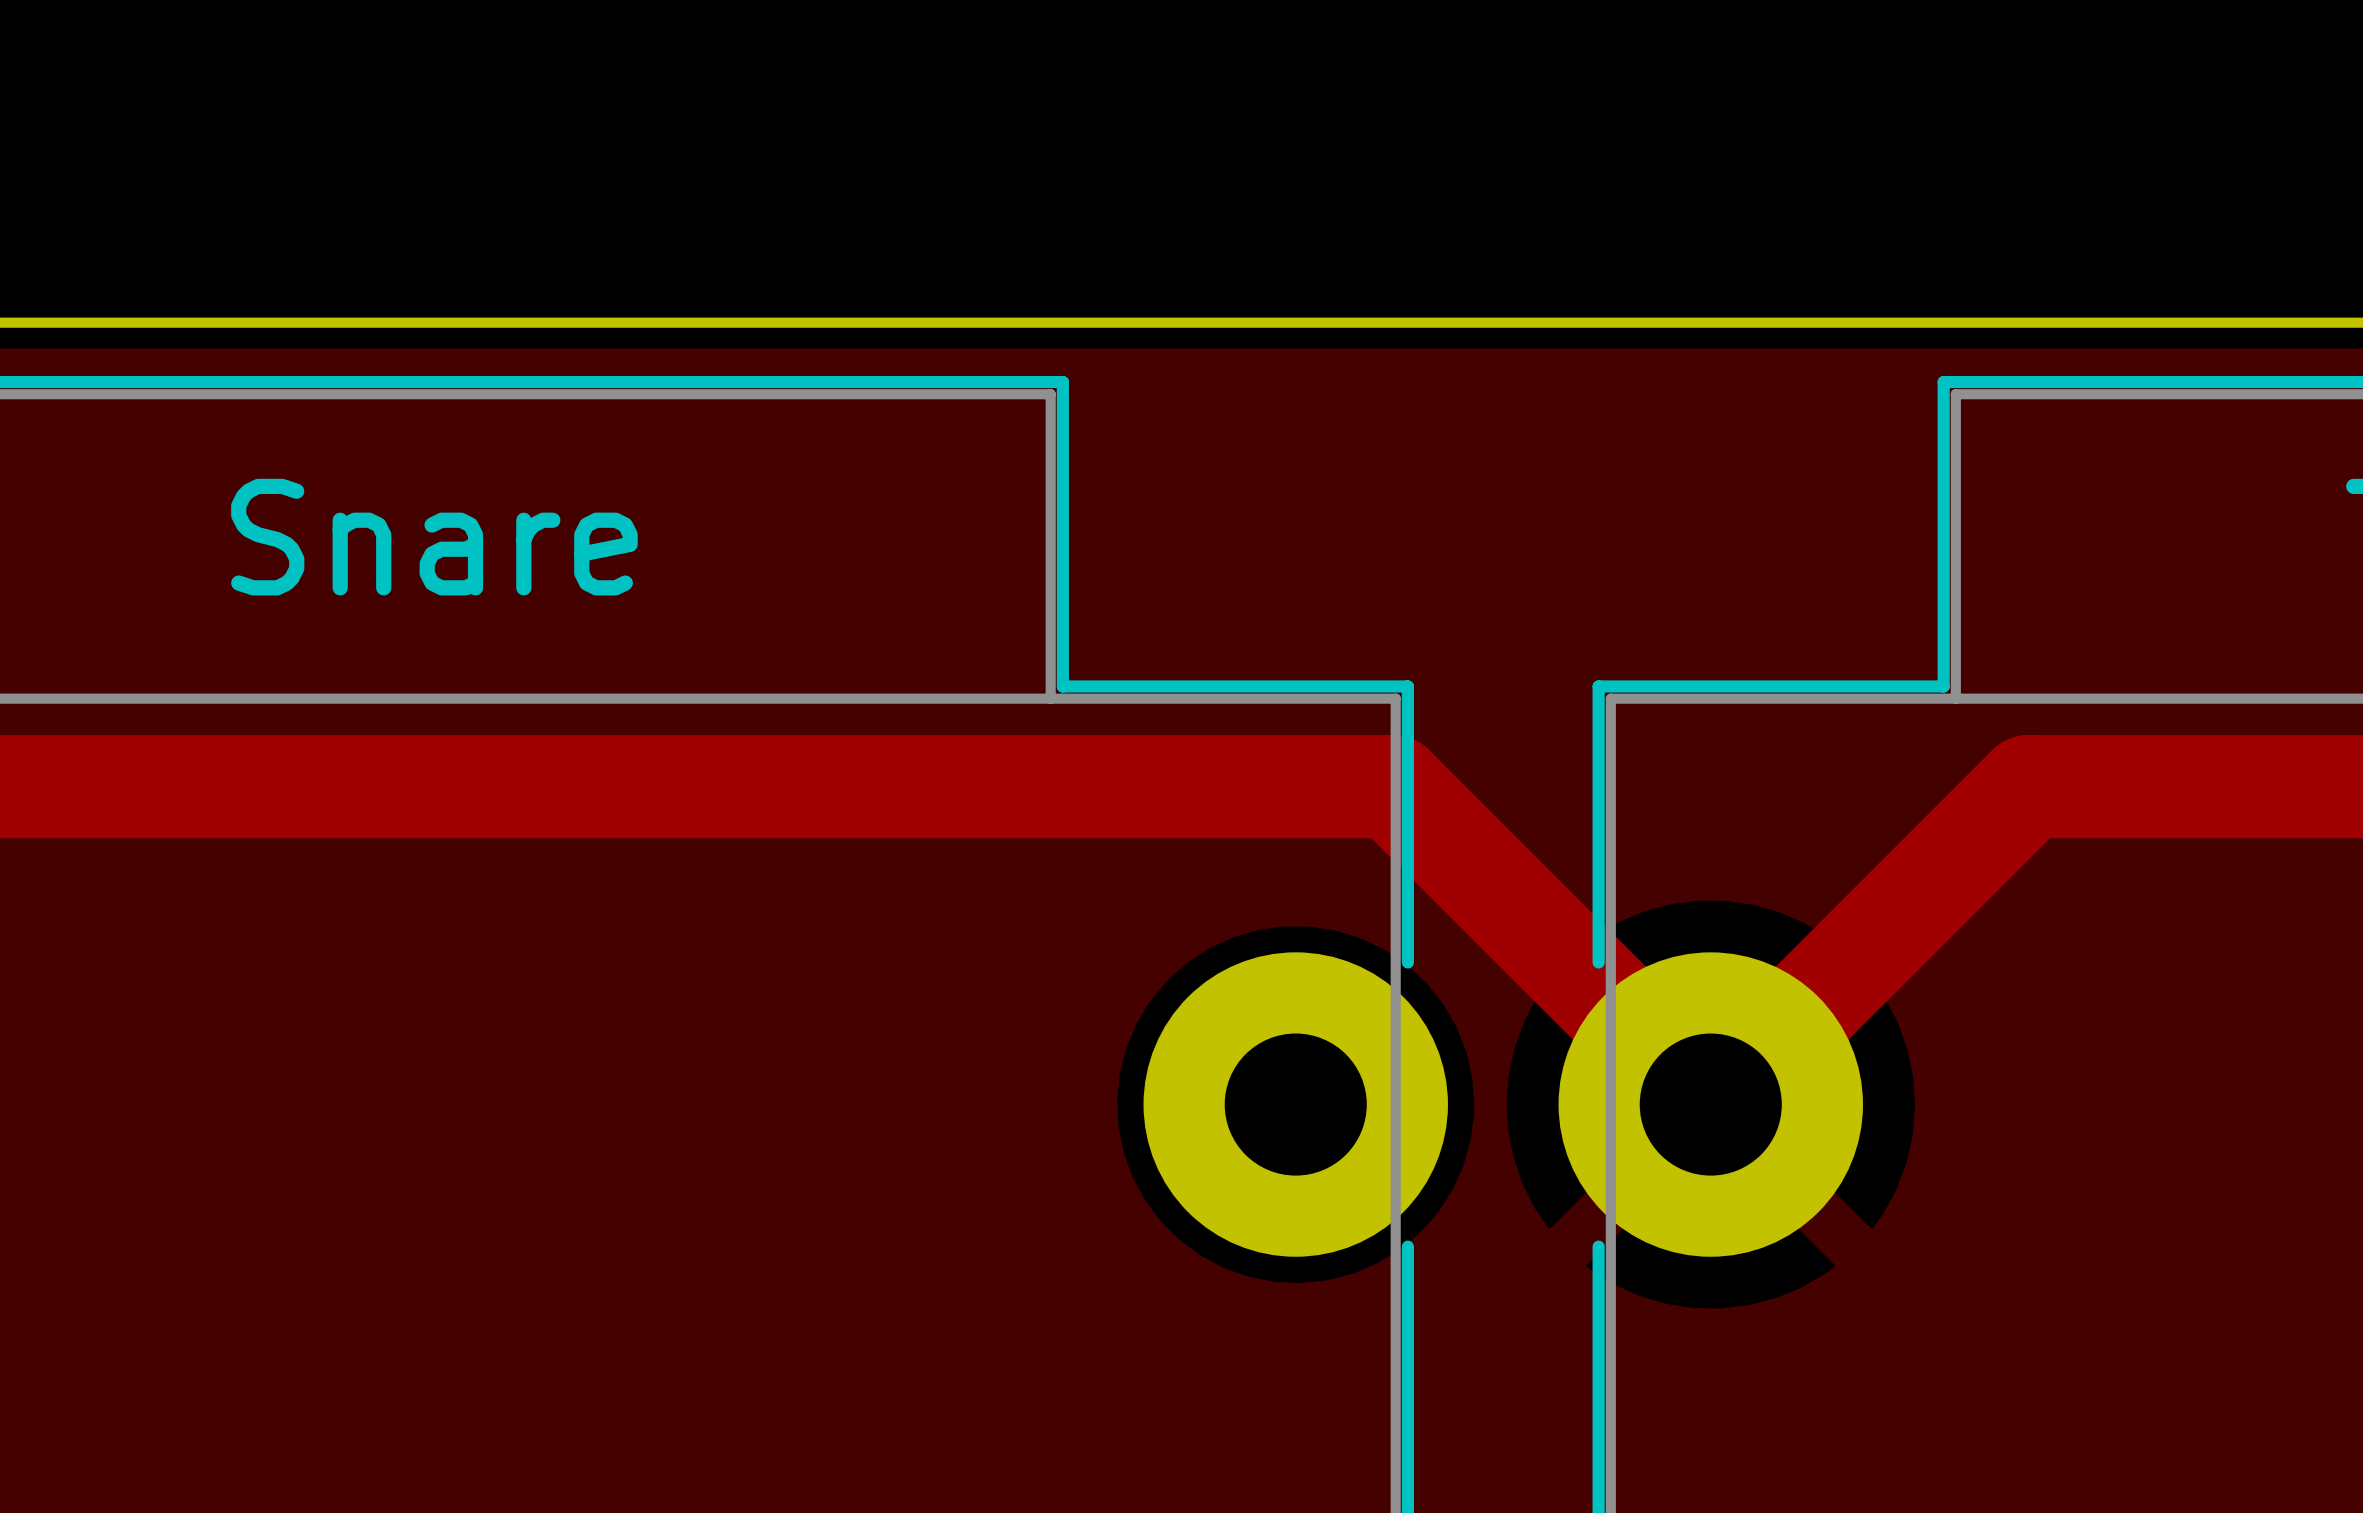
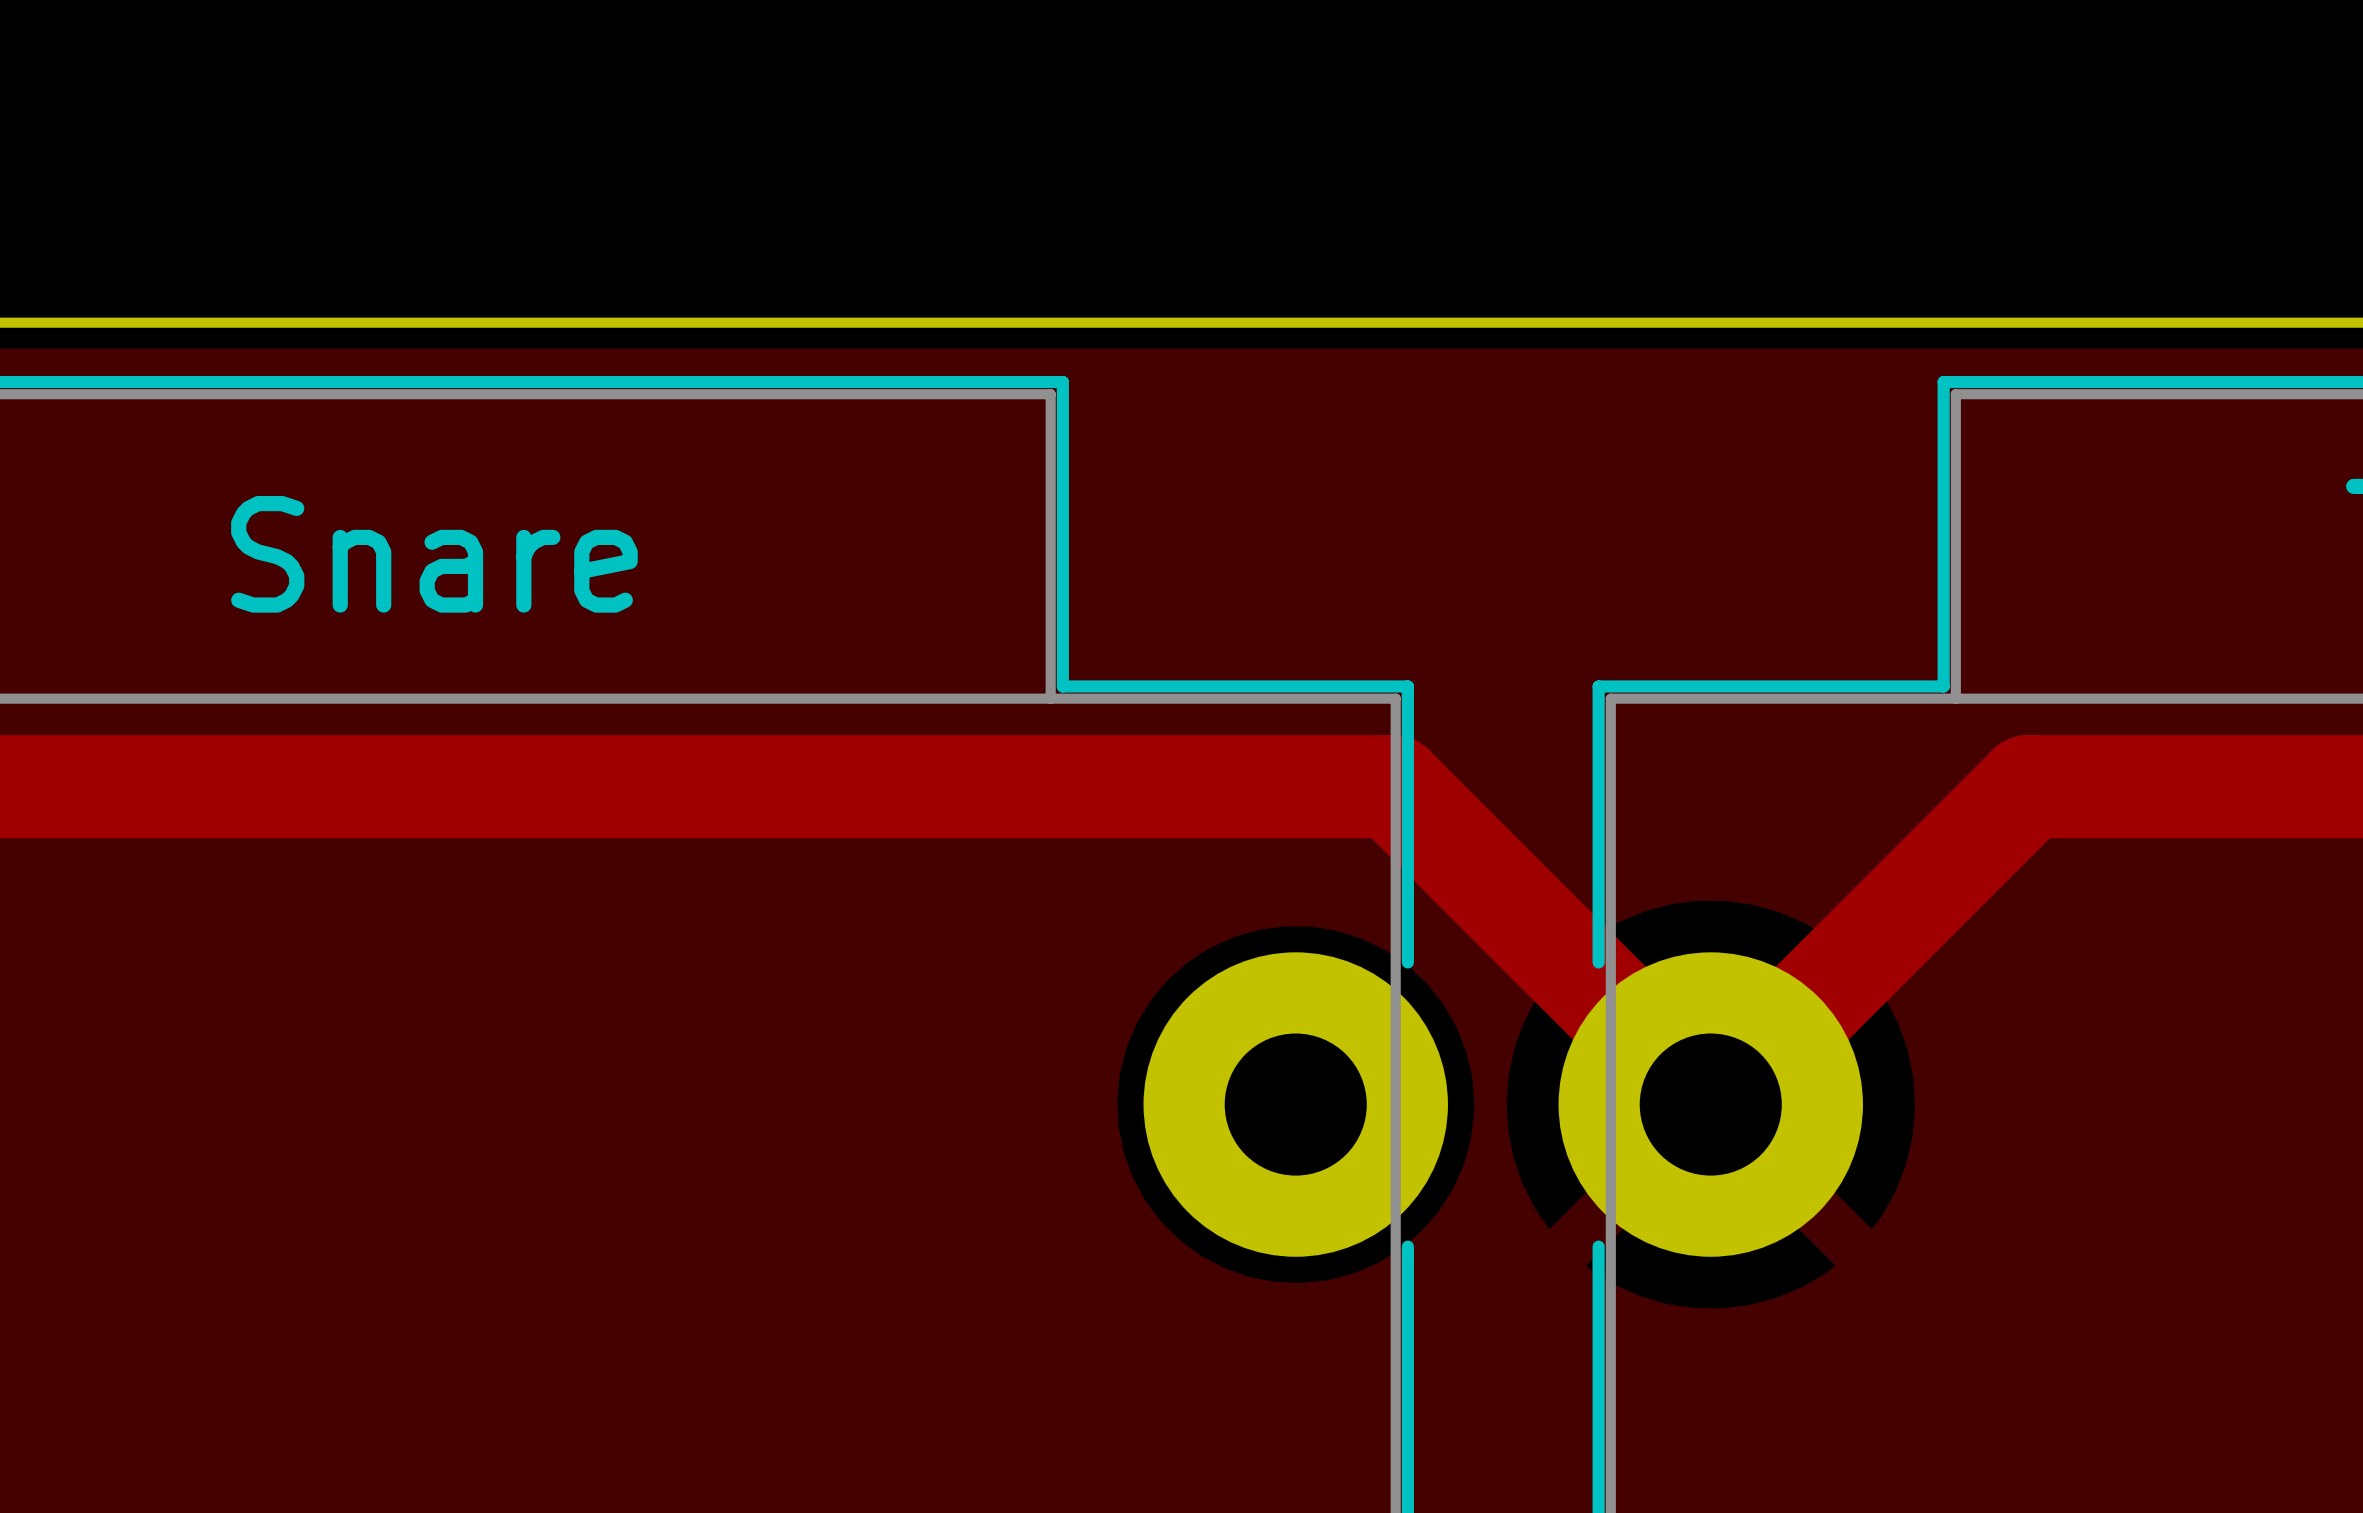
part value position: Snare (434, 537) -> Snare (434, 554)

